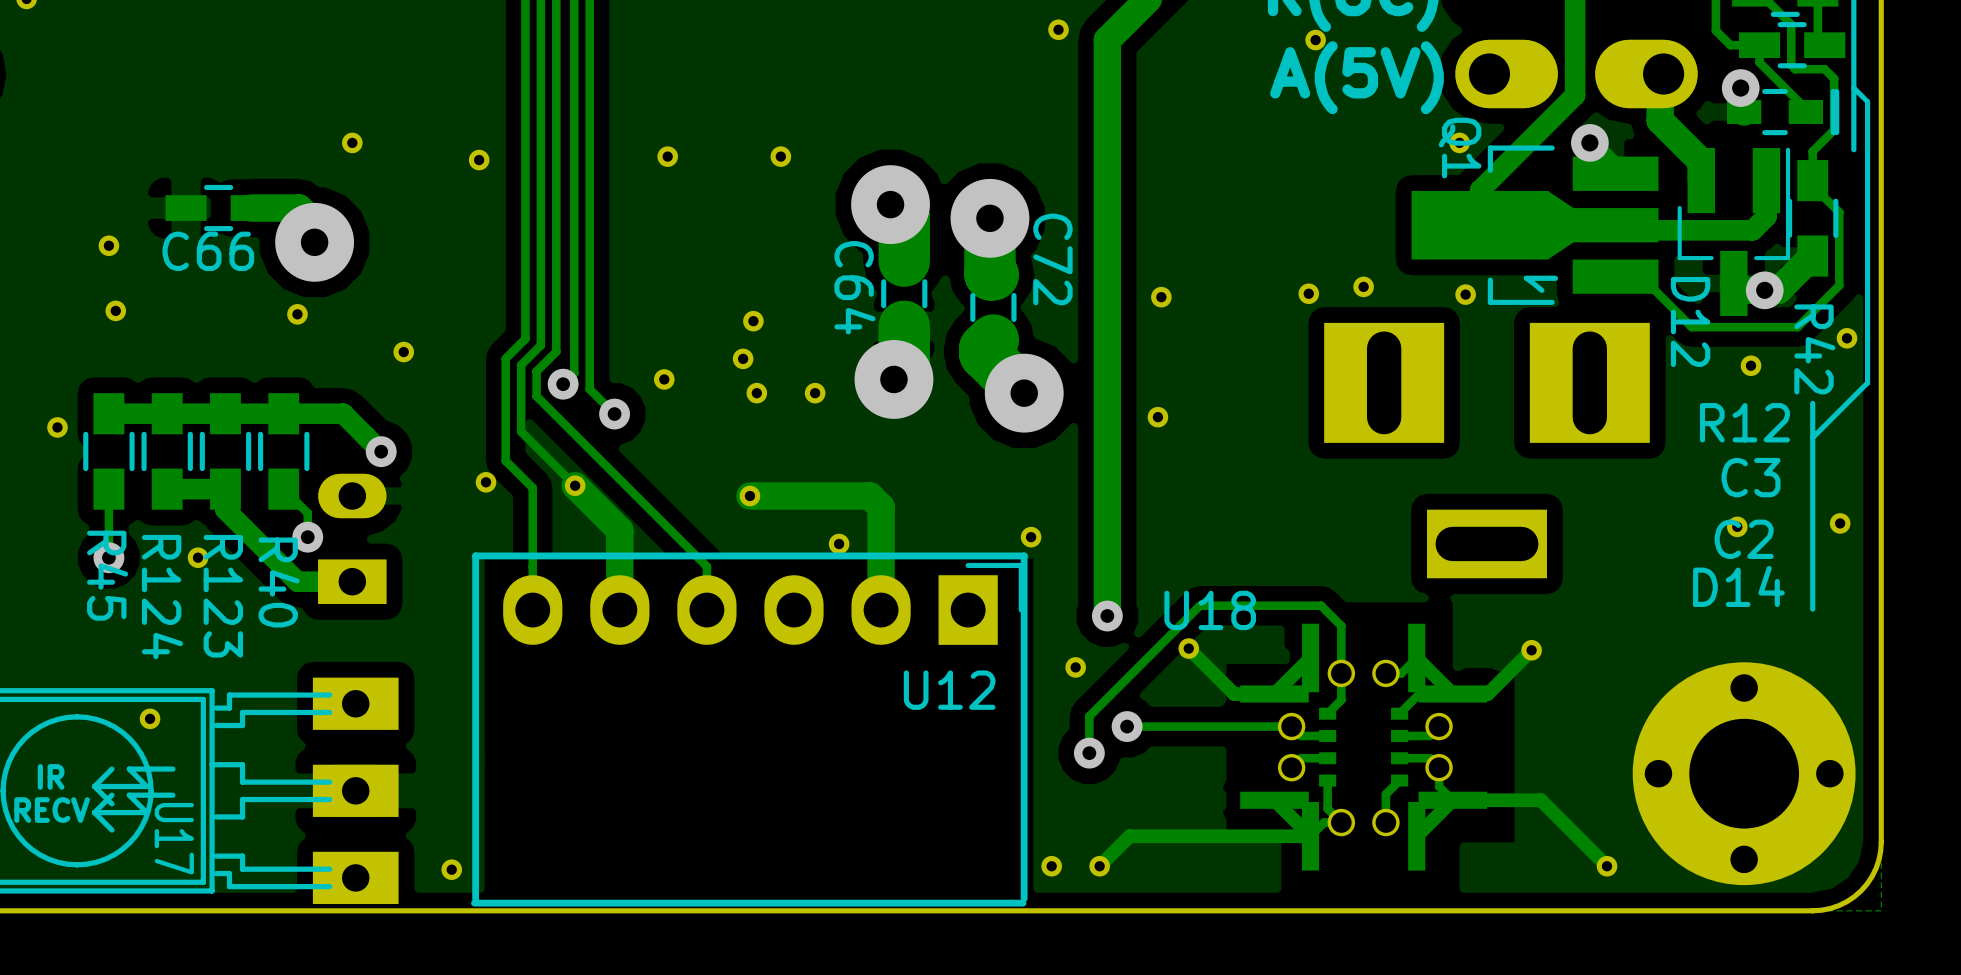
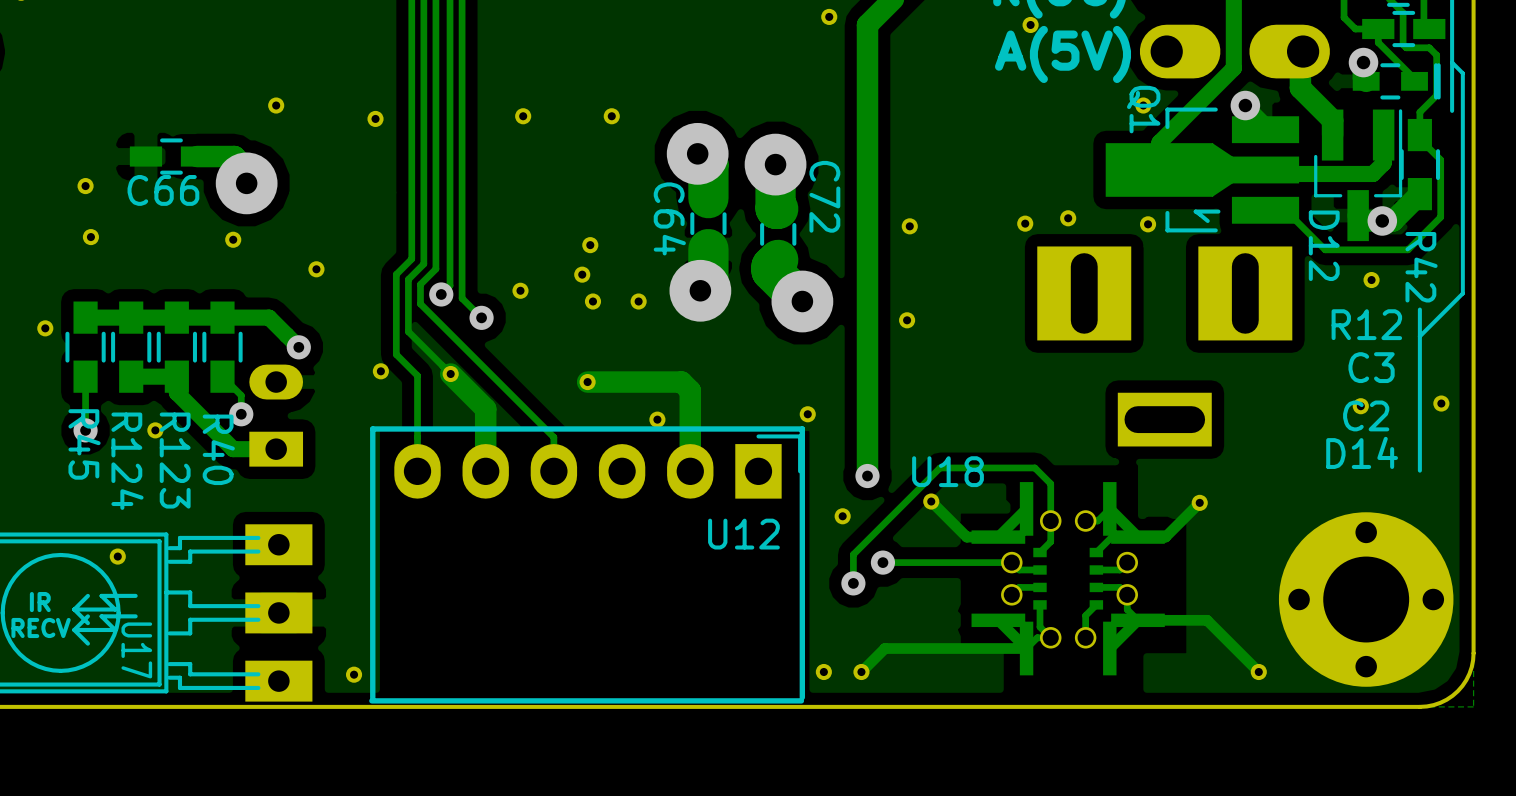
part: (1847, 338) -> none

